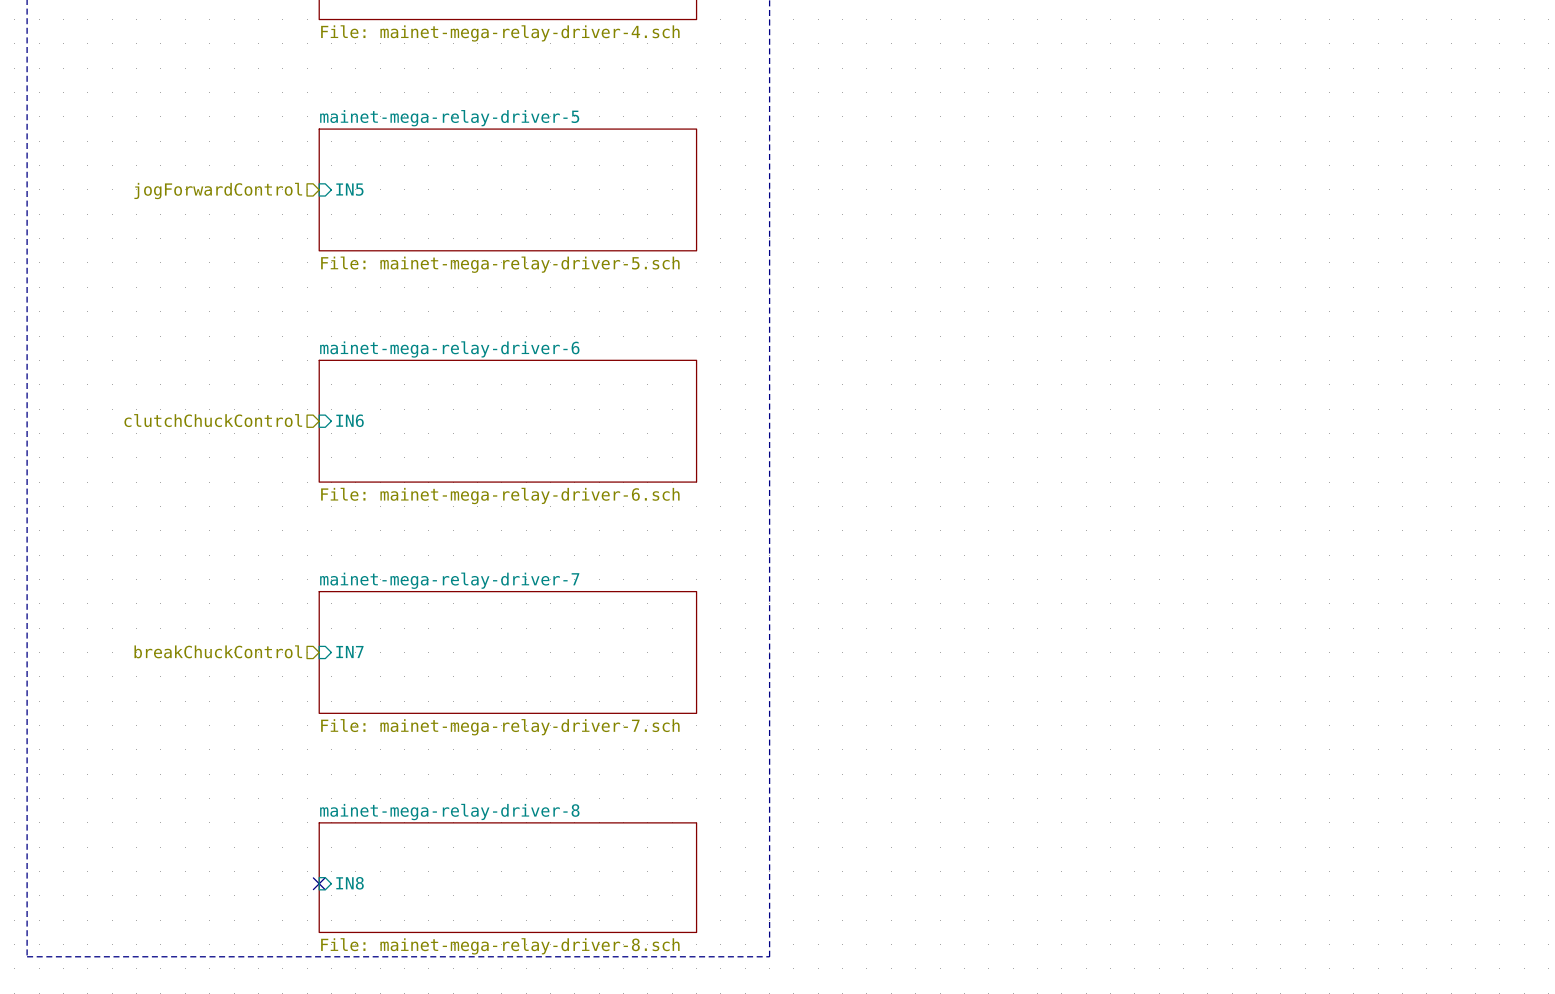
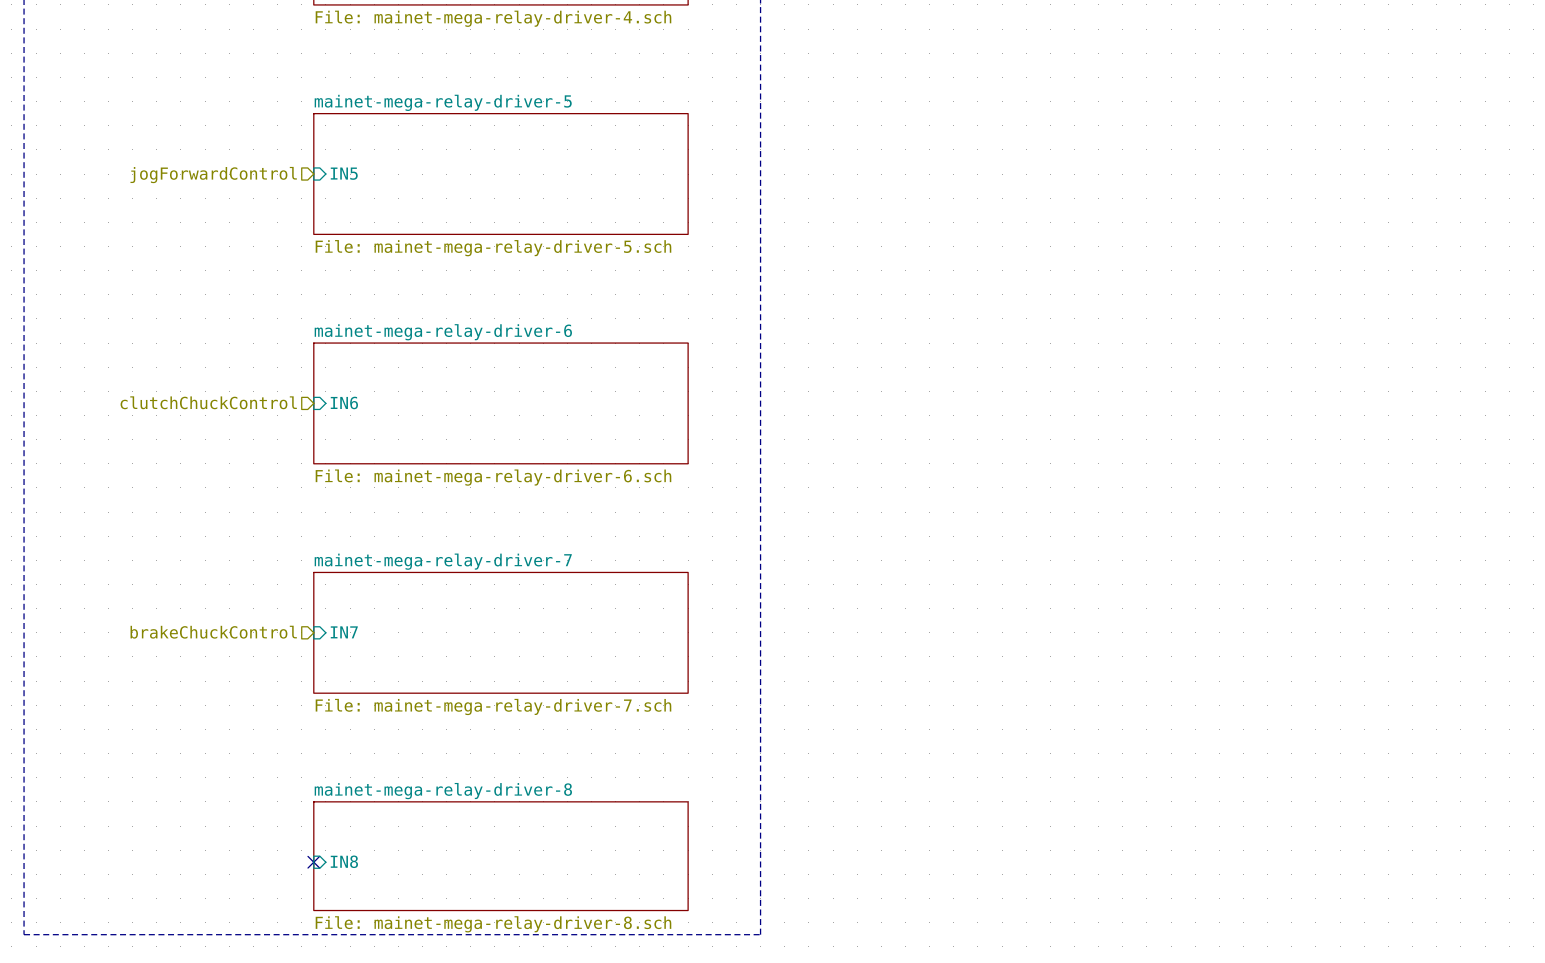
hierarchical label: breakChuckControl (218, 651) -> brakeChuckControl (213, 632)

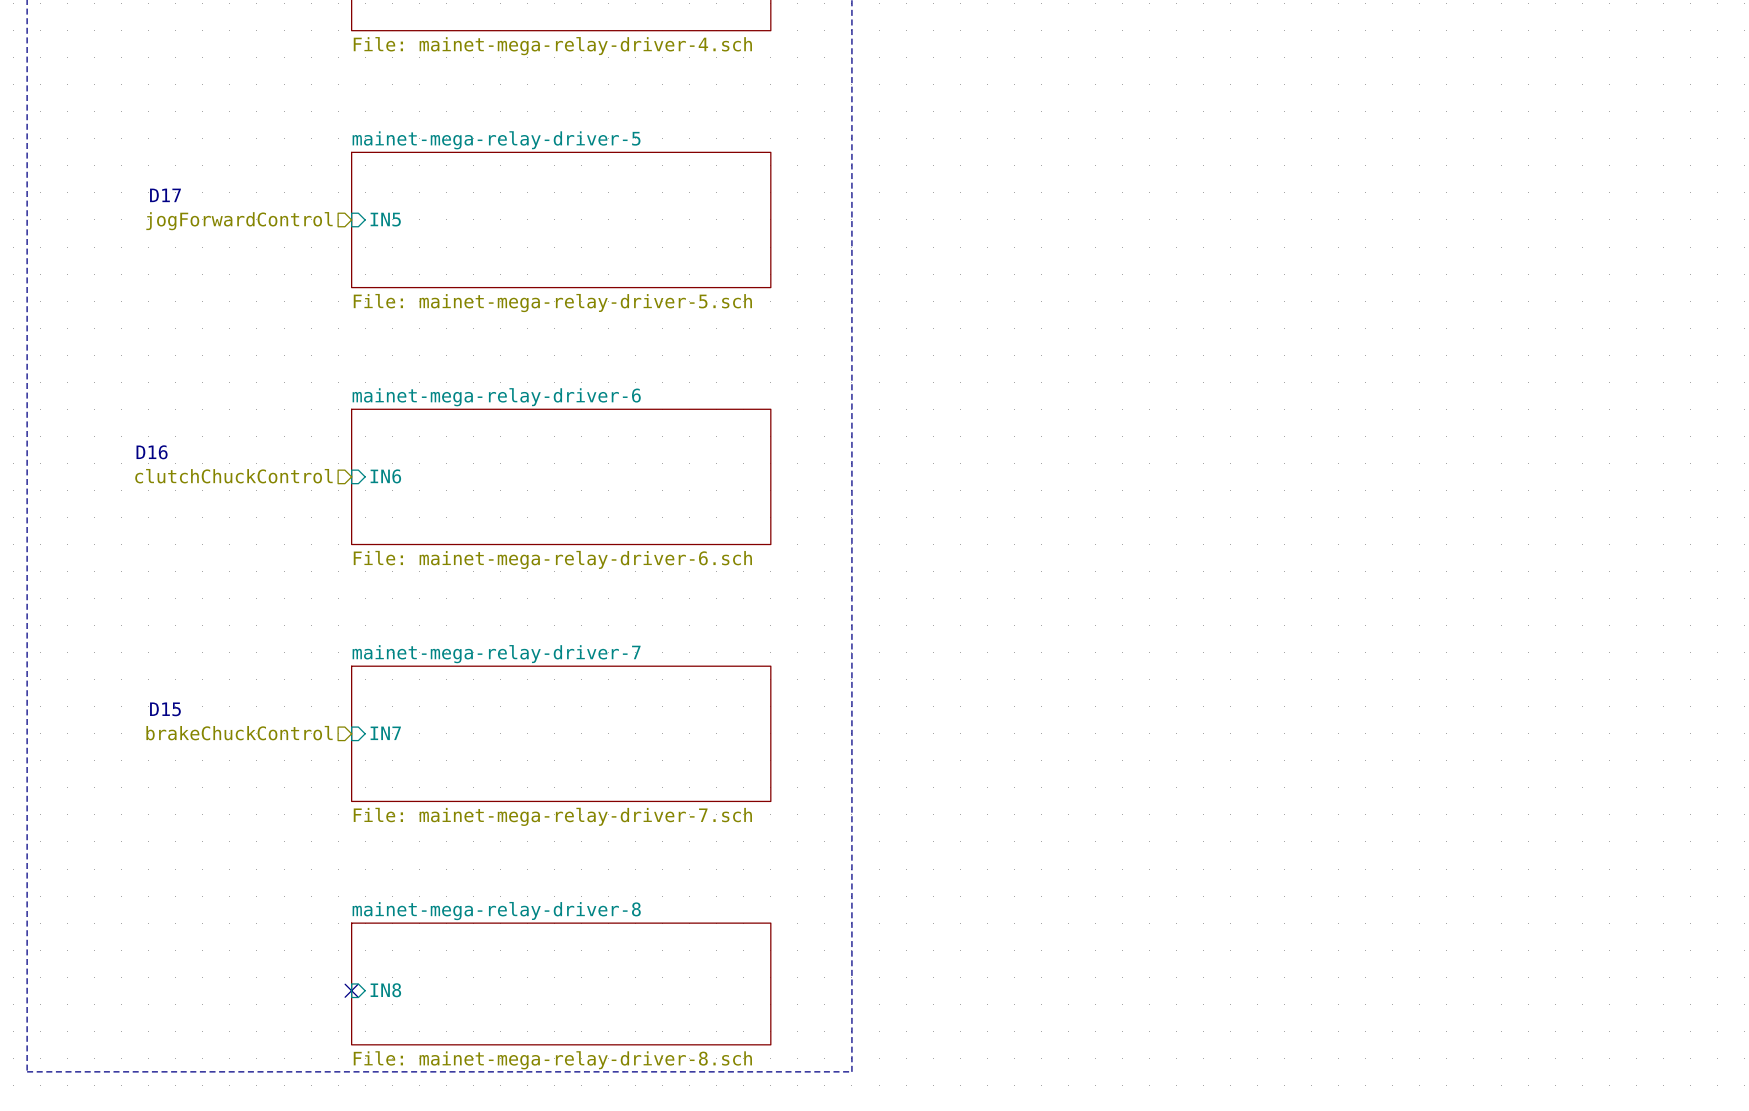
text: none -> D17 (165, 195)
text: none -> D16 (152, 452)
text: none -> D15 (165, 709)

